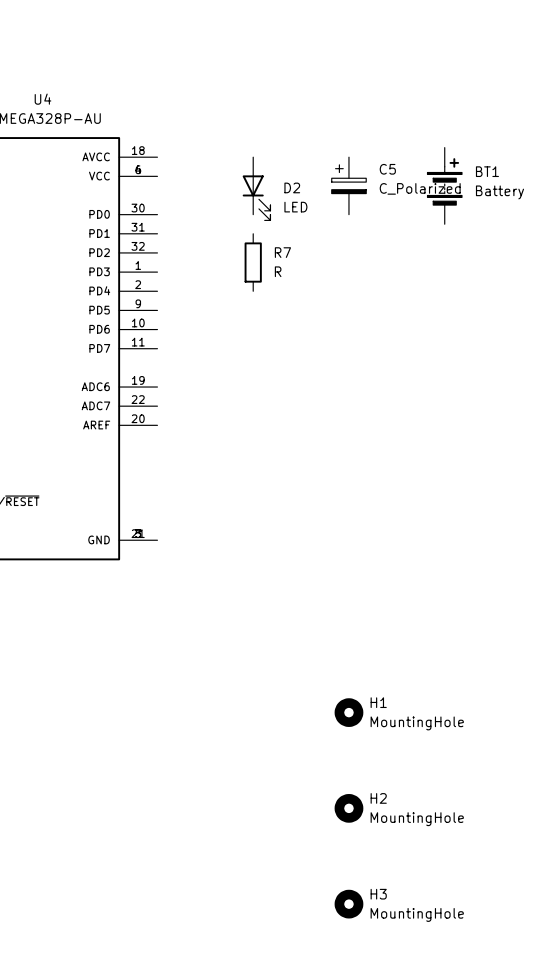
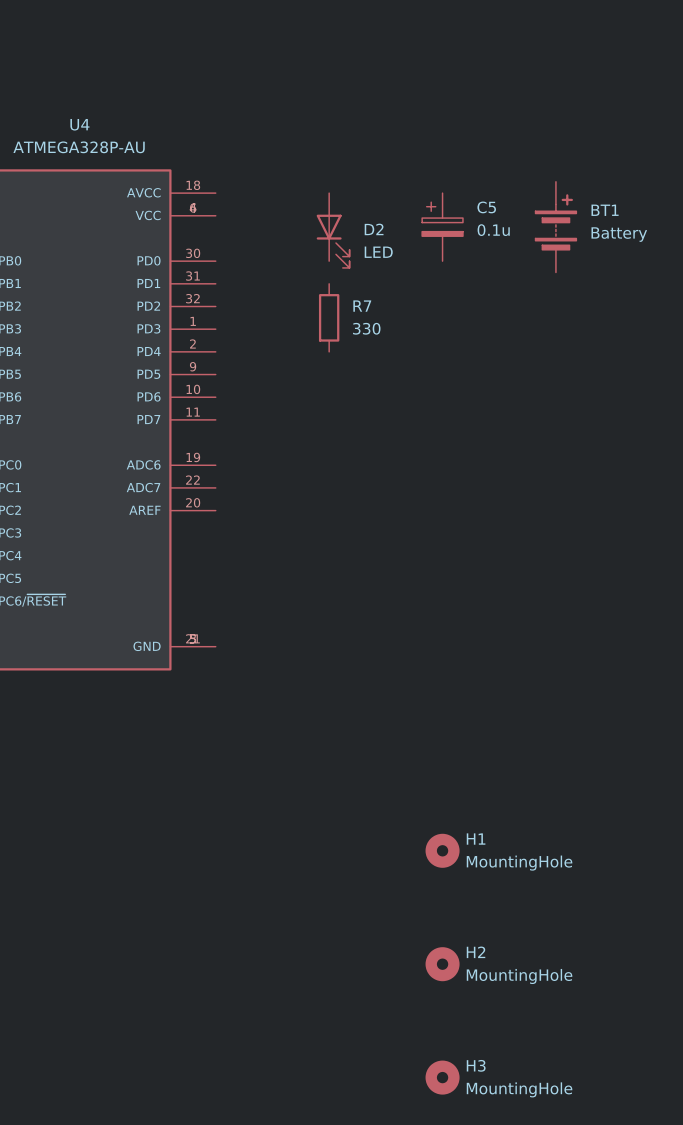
C5 value: C_Polarized (420, 188) -> 0.1u (493, 230)
R7 value: R (278, 271) -> 330 (366, 328)

